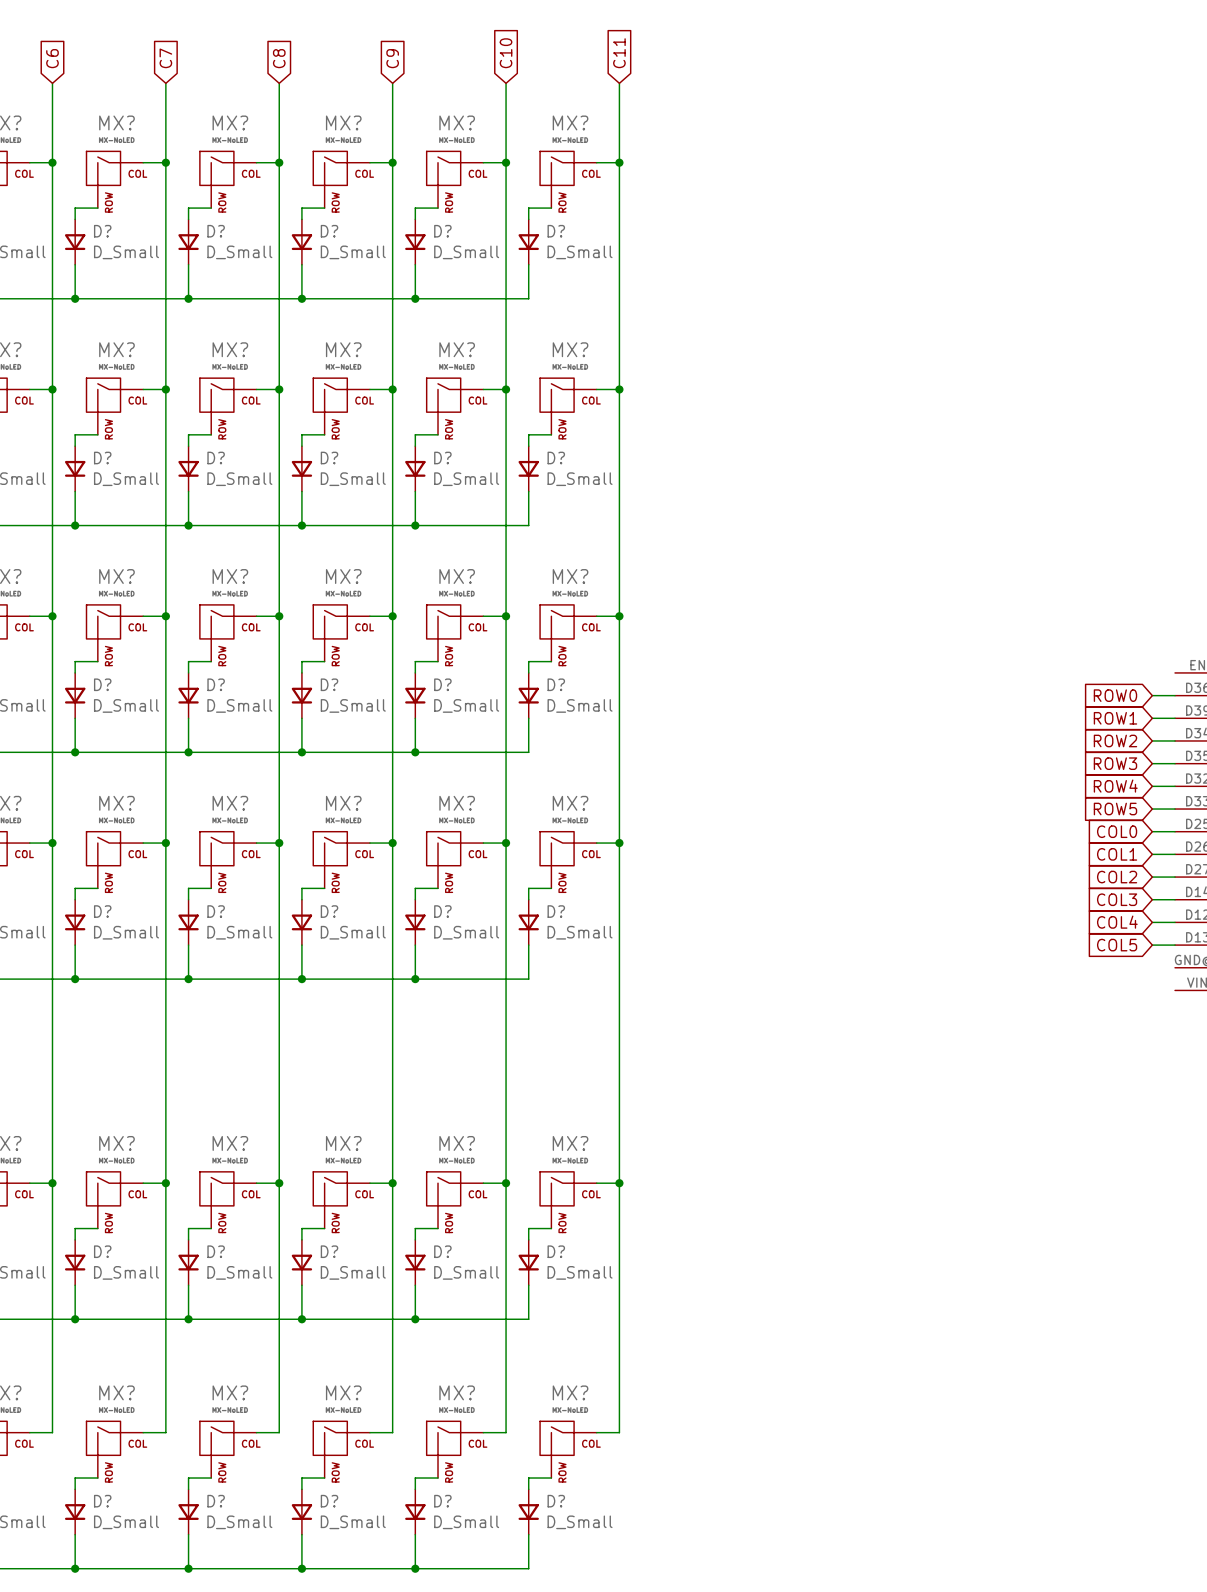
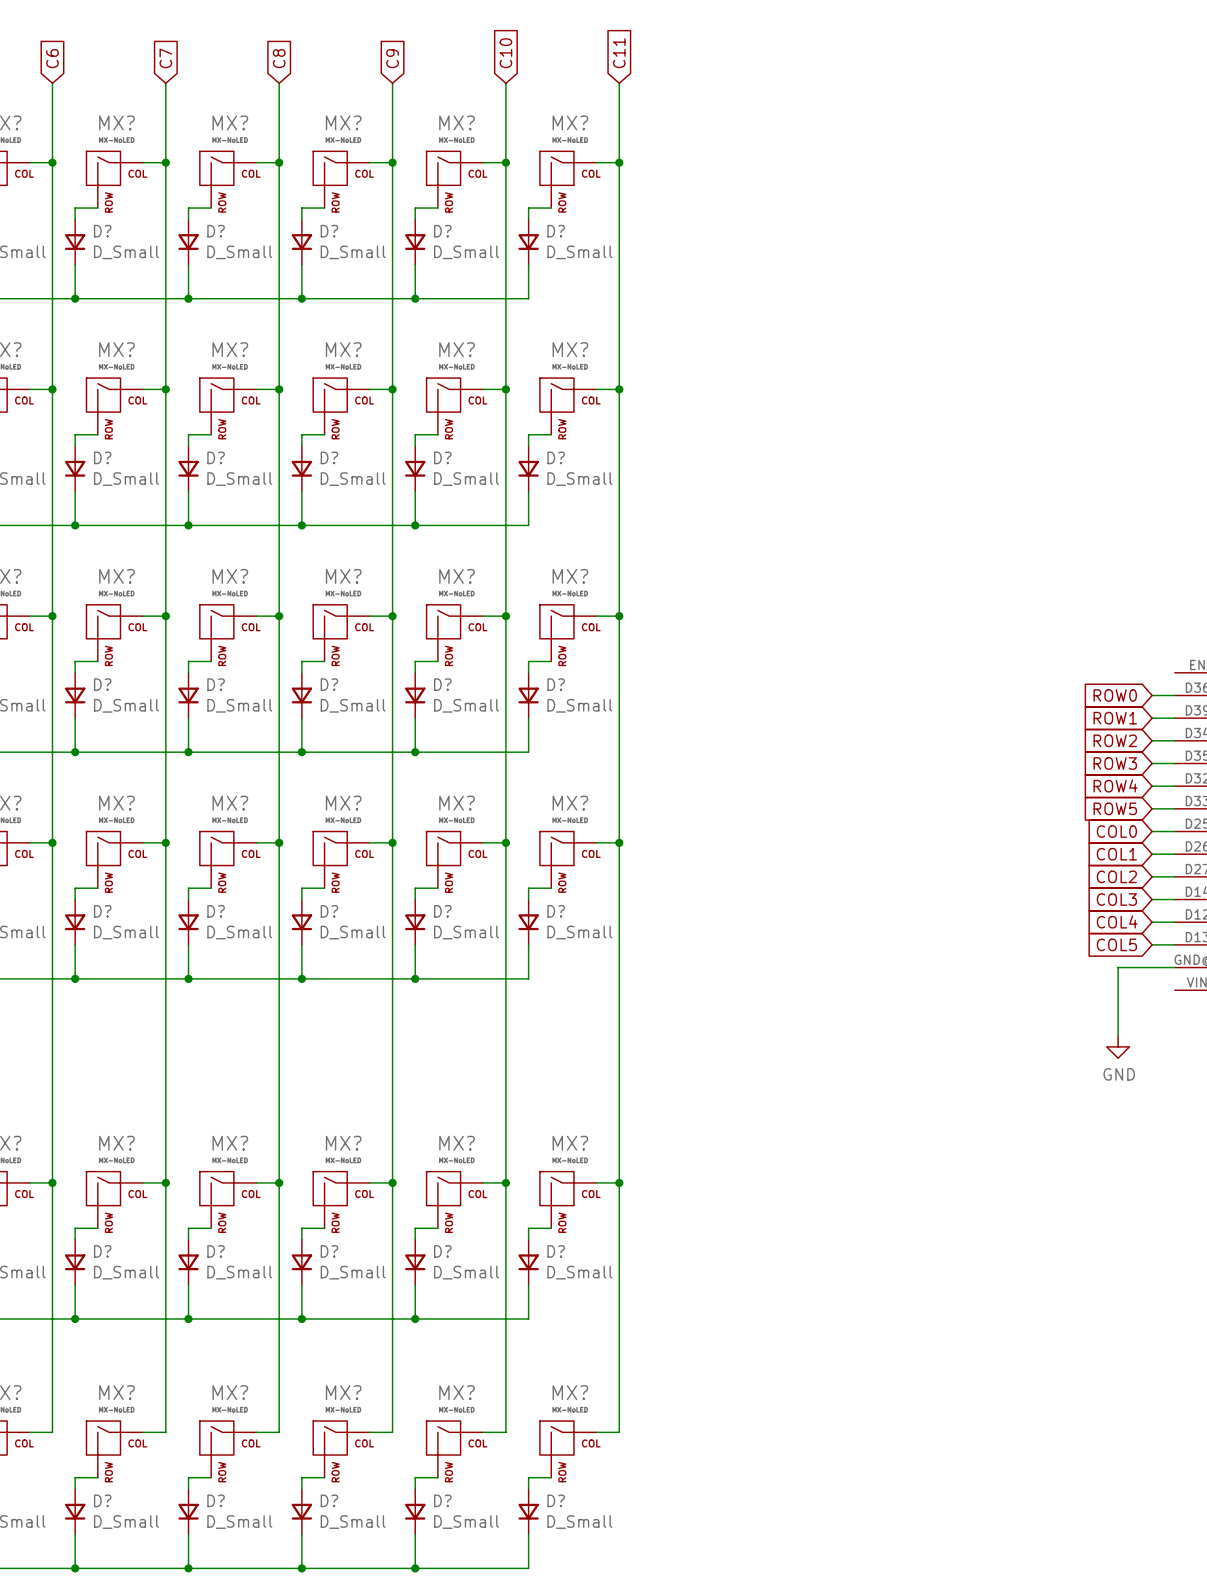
wire: none -> (1174, 967) (1118, 967) (1118, 1035)
power symbol: none -> GND (1118, 1046)

